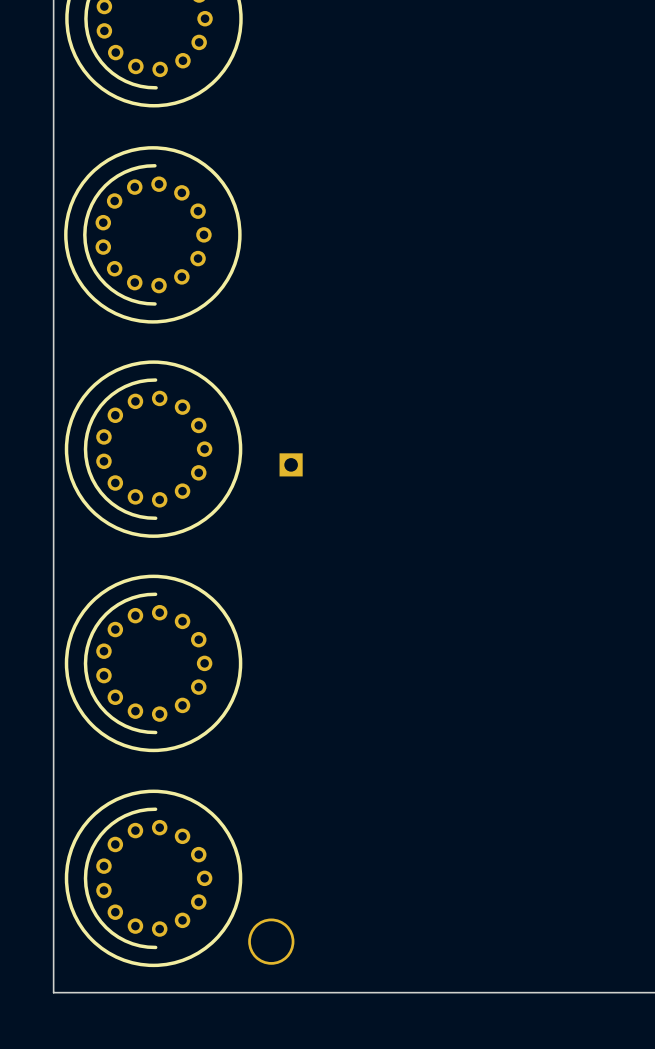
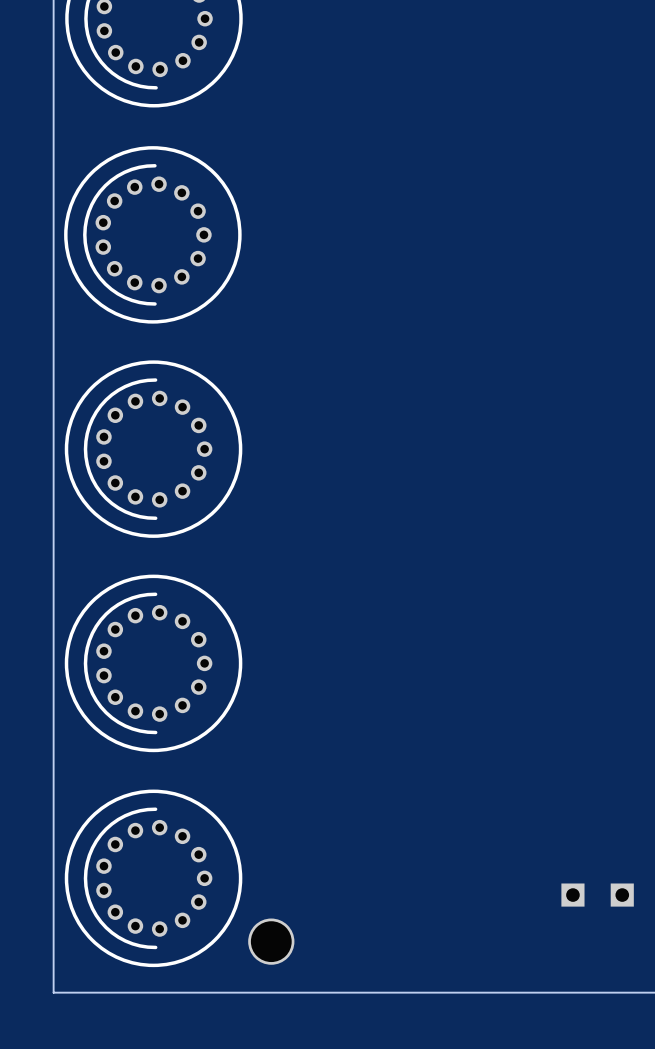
part: (291, 464) -> none
part: none -> (572, 895)
part: none -> (622, 895)

